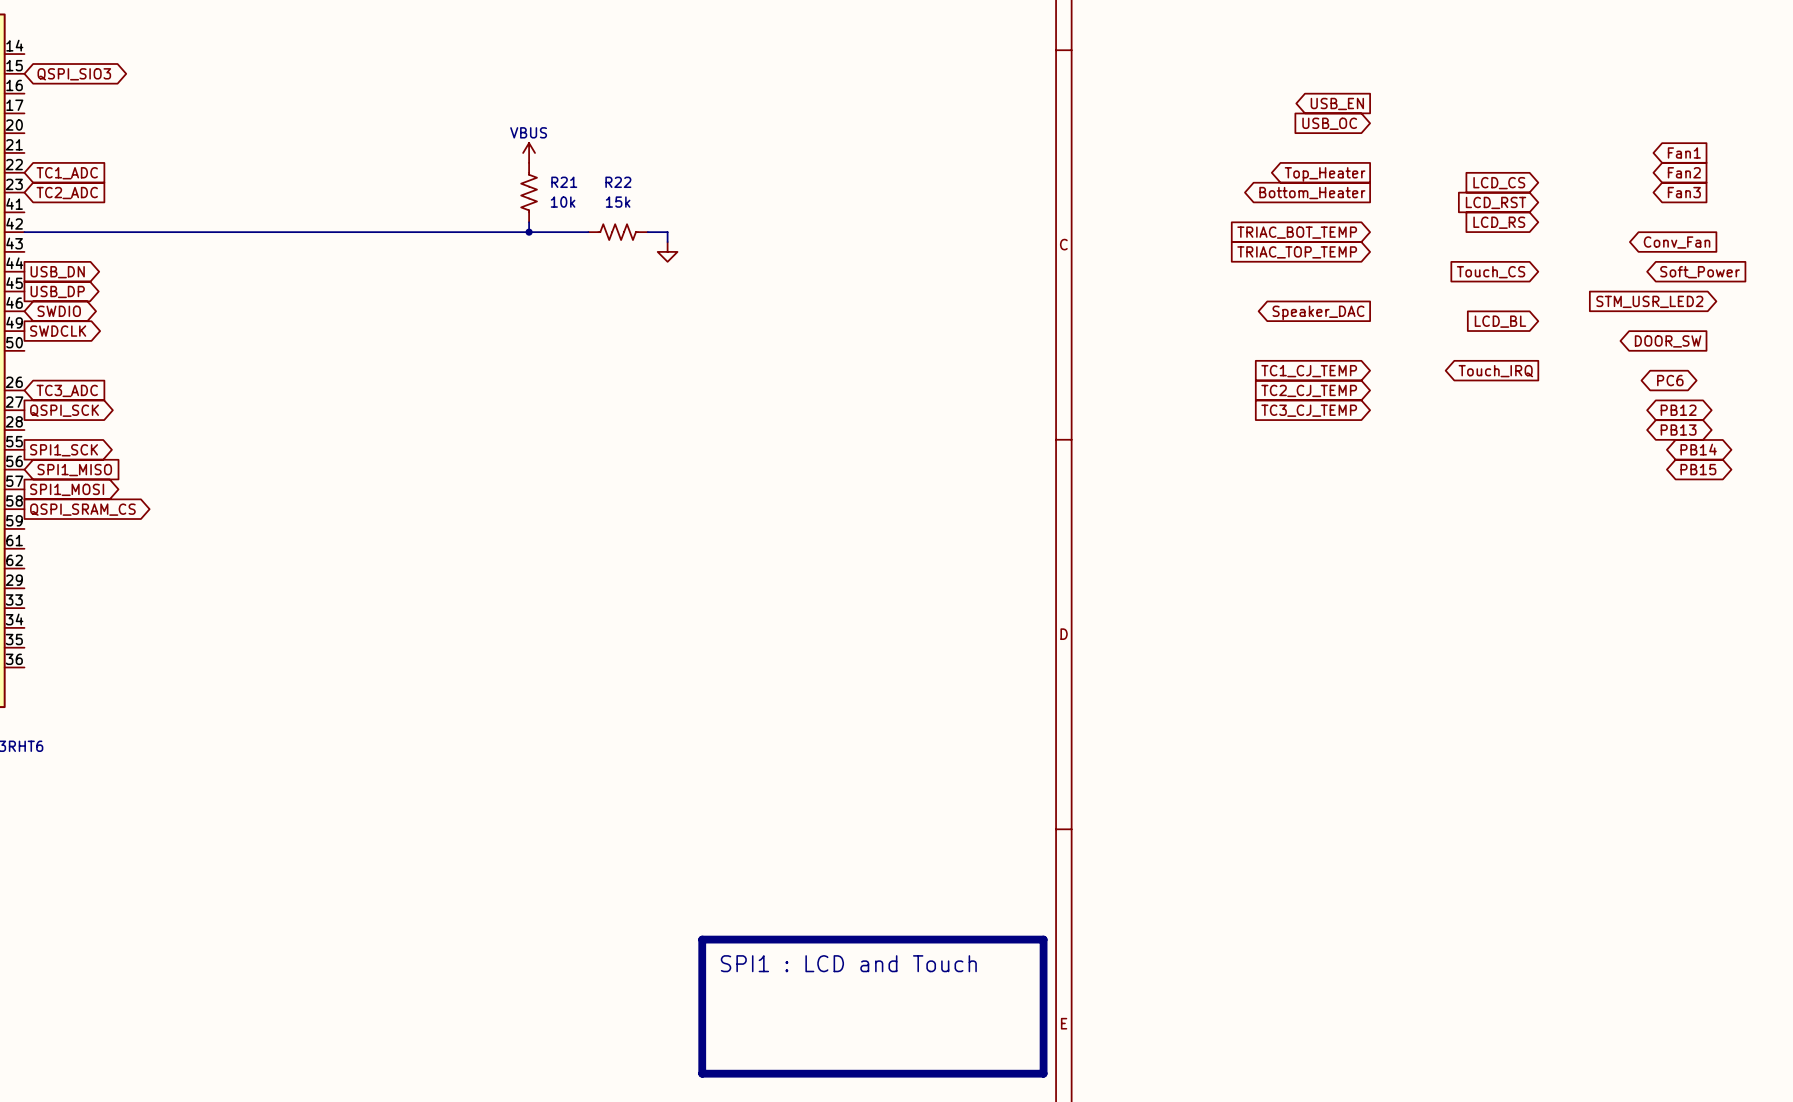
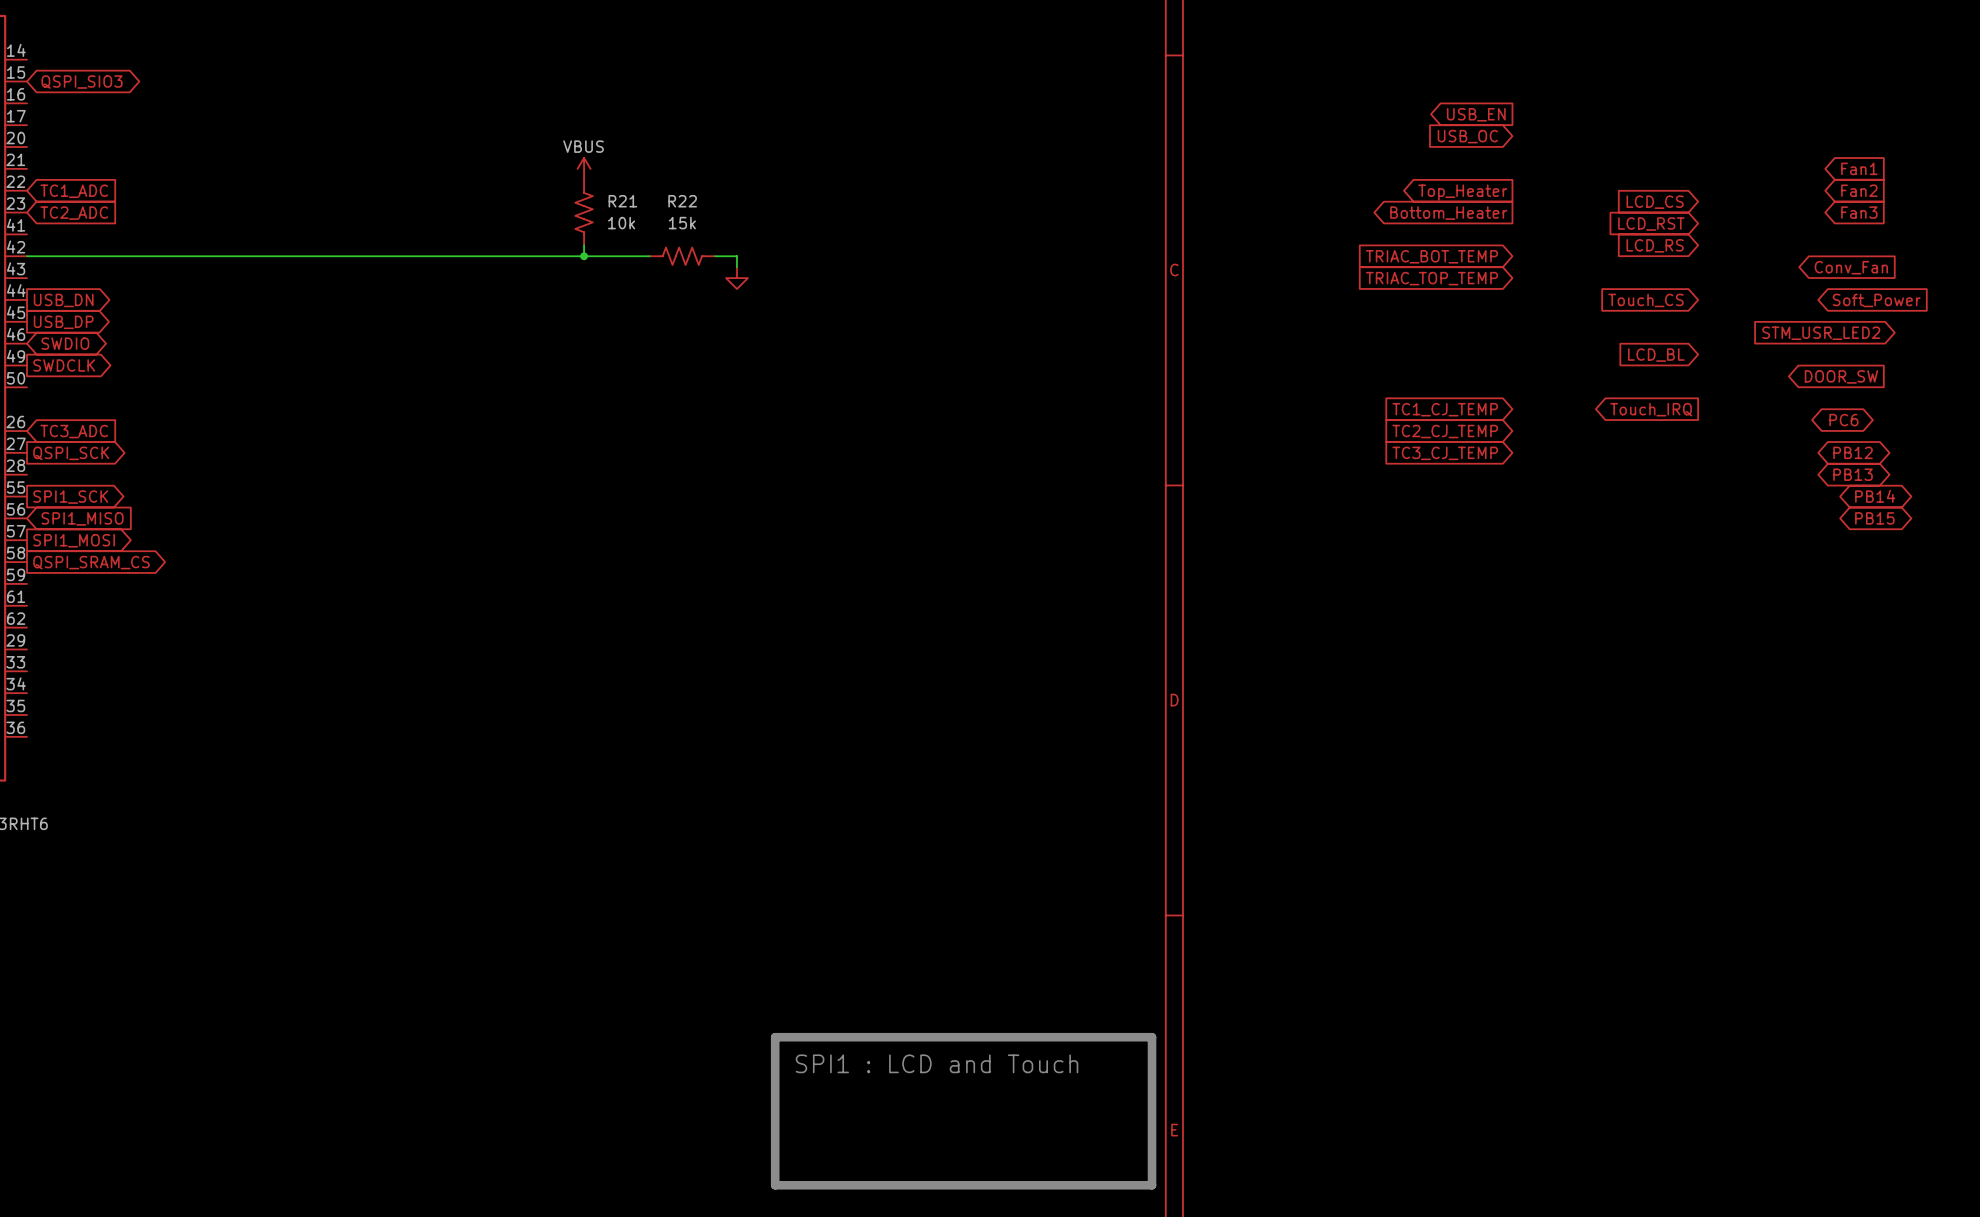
global label: Speaker_DAC (1318, 312) -> none

